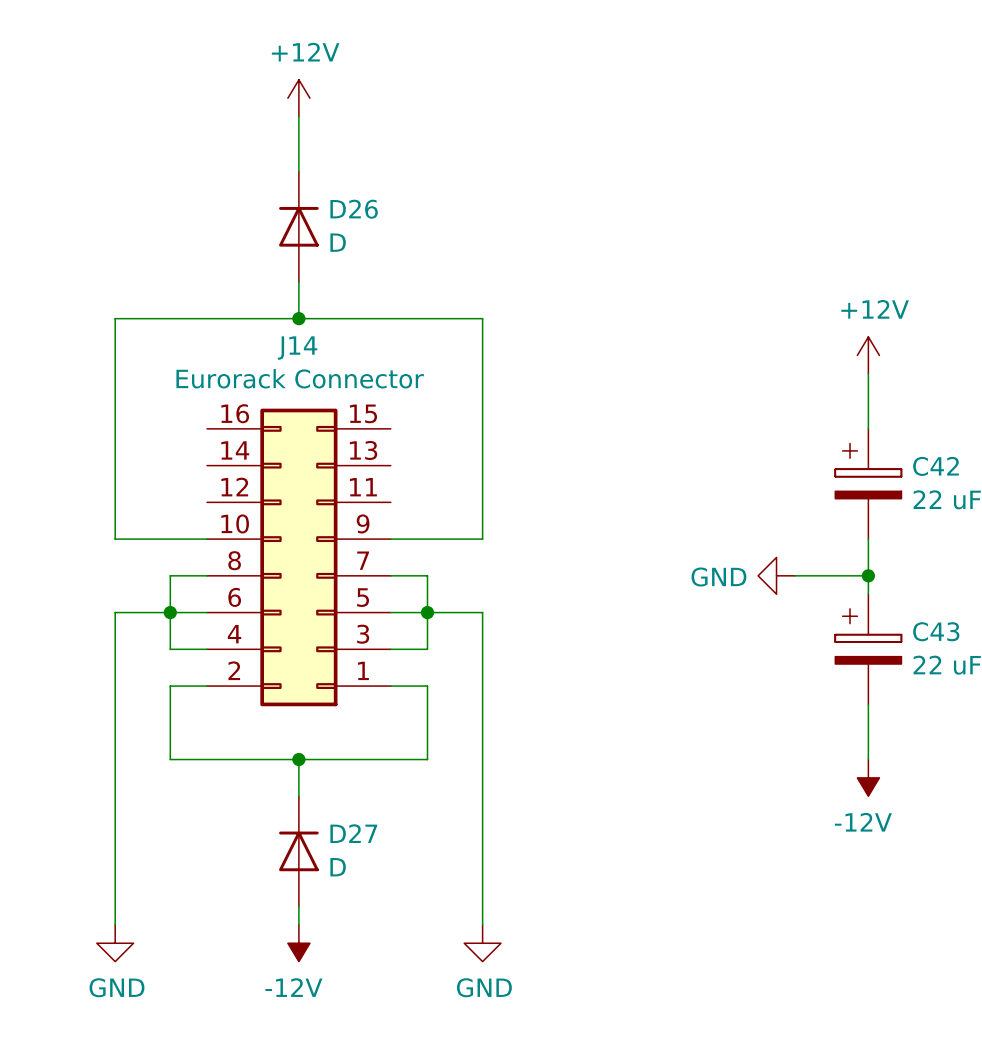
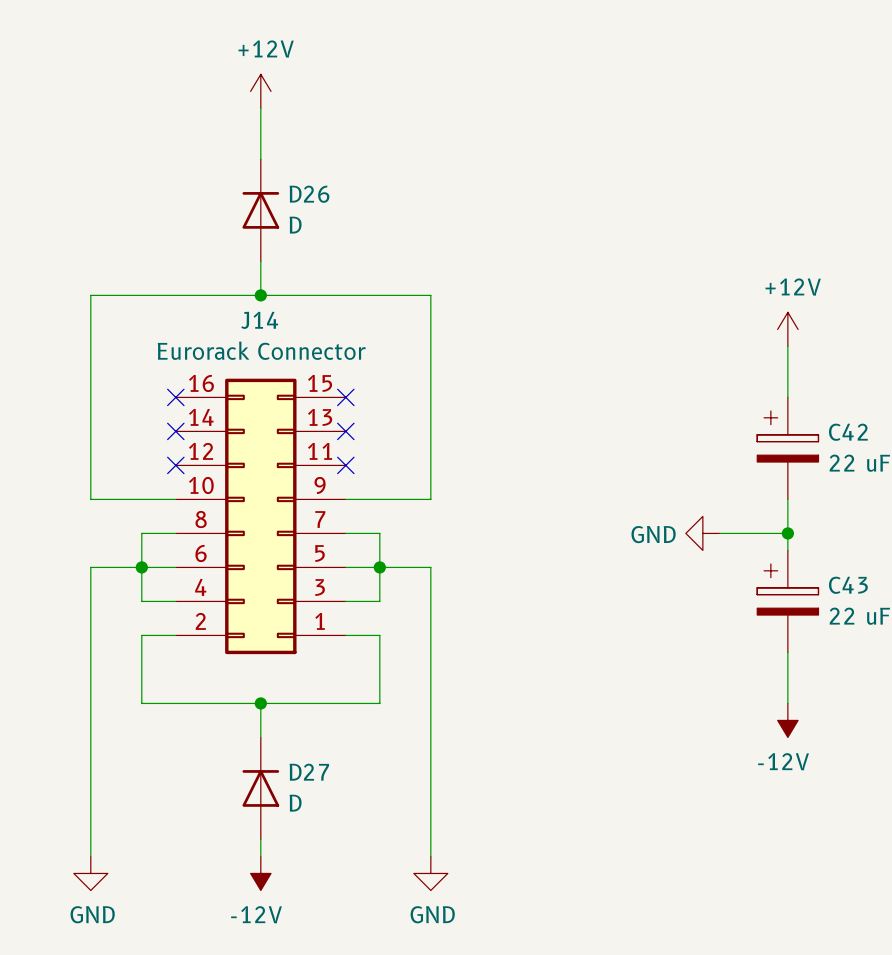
no-connect mark: none -> (175, 397)
no-connect mark: none -> (345, 397)
no-connect mark: none -> (175, 431)
no-connect mark: none -> (345, 431)
no-connect mark: none -> (175, 465)
no-connect mark: none -> (345, 465)

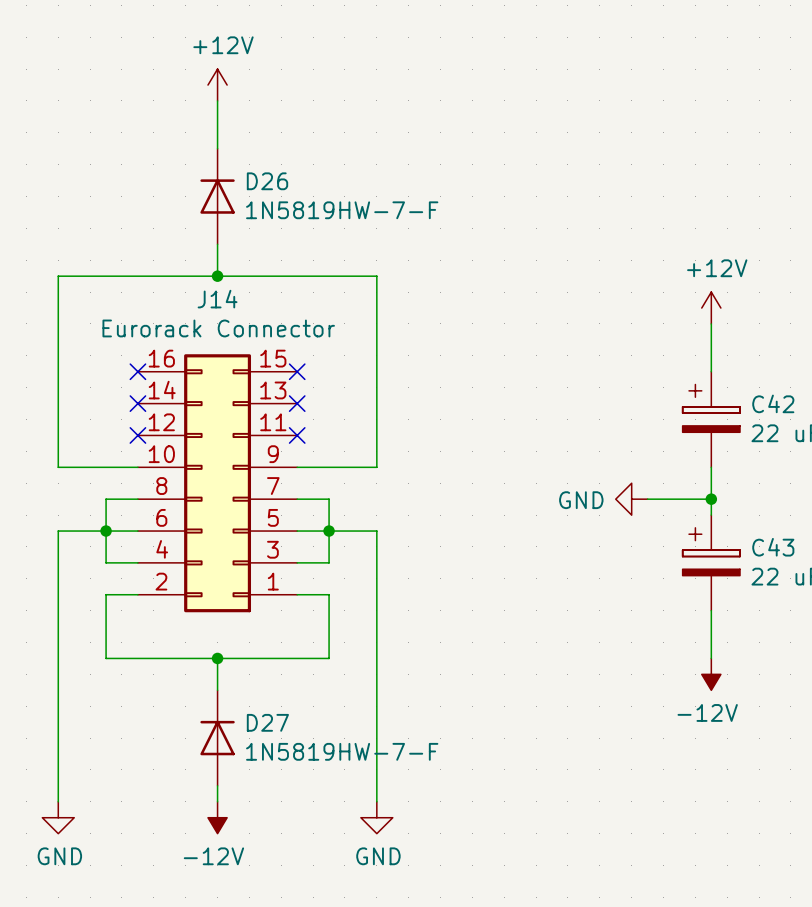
D26 value: D (295, 225) -> 1N5819HW-7-F (342, 210)
D27 value: D (295, 803) -> 1N5819HW-7-F (342, 751)

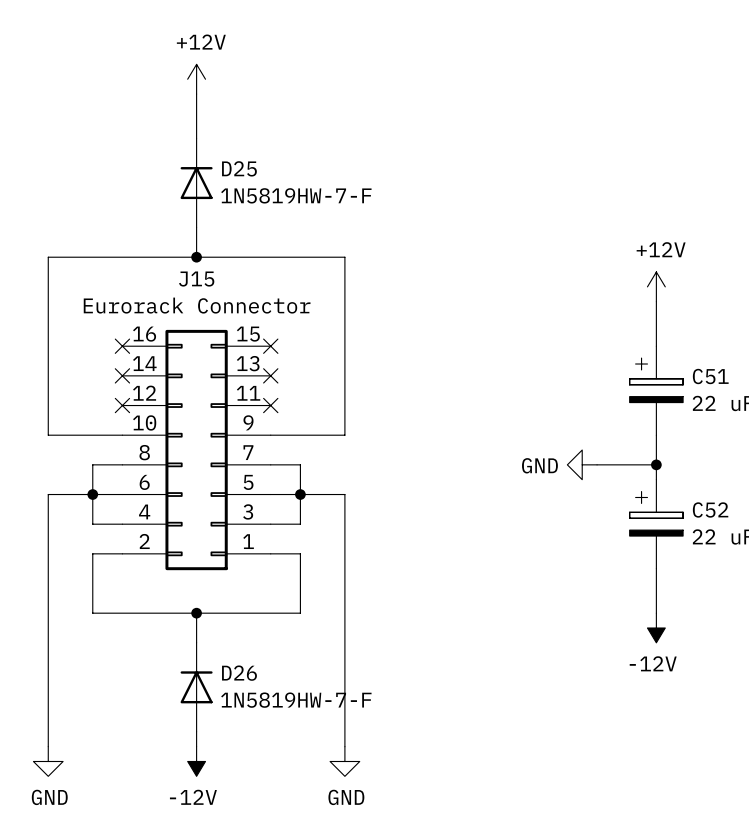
D26 name: D26 (267, 181) -> D25 (239, 168)
J14 name: J14 (217, 299) -> J15 (196, 279)
C42 name: C42 (773, 403) -> C51 (710, 376)
C43 name: C43 (773, 547) -> C52 (710, 509)
D27 name: D27 (267, 722) -> D26 (239, 673)

